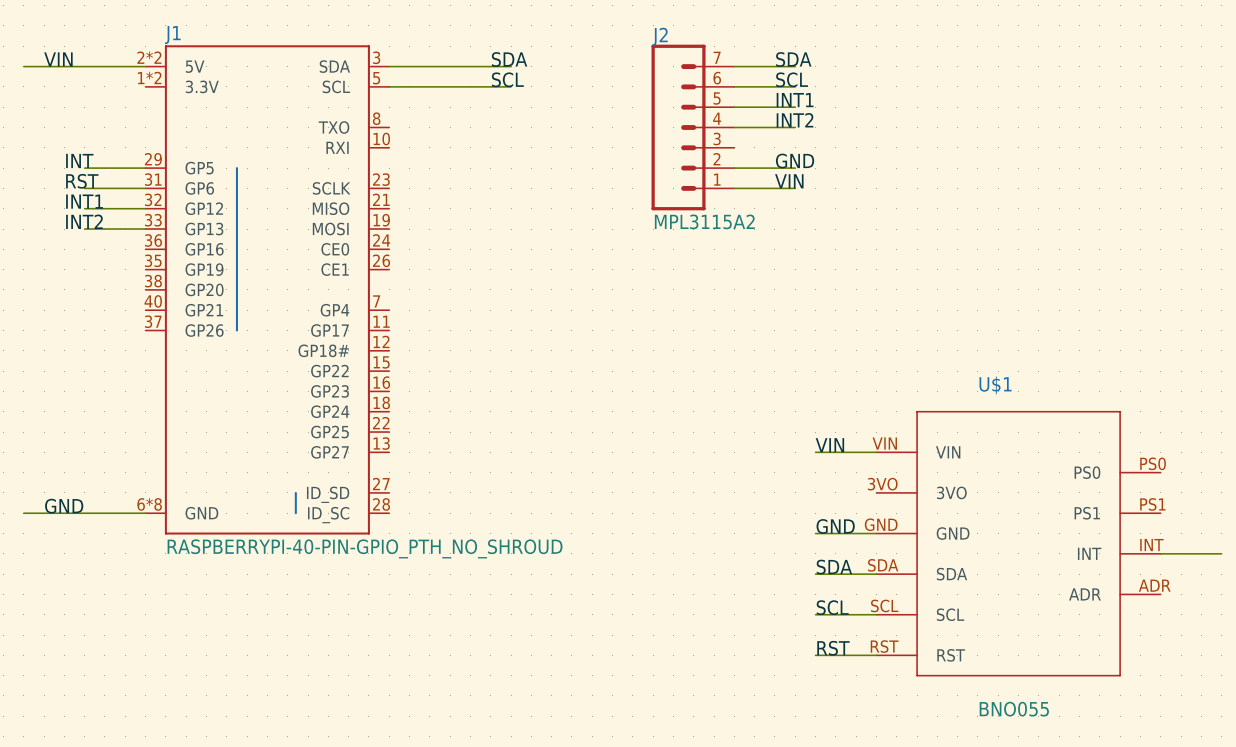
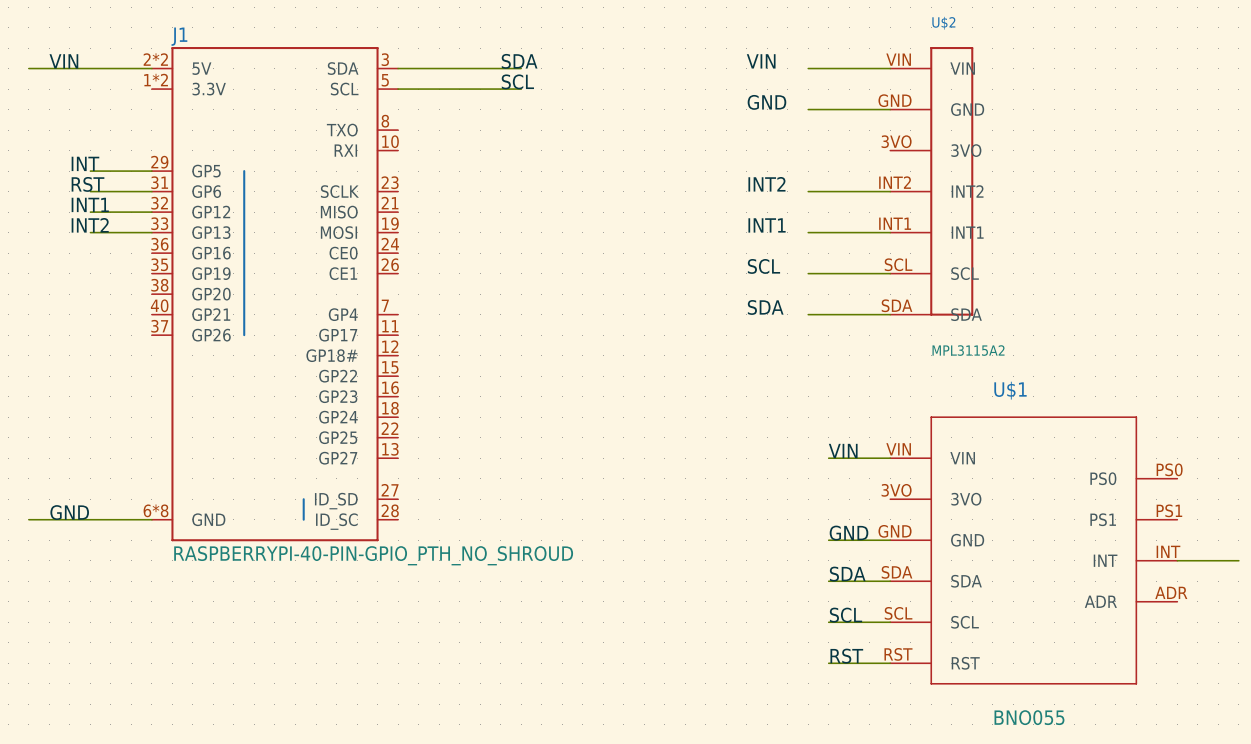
label: SDA (793, 59) -> none
wire: (734, 66) (795, 66) -> (890, 68) (808, 68)
label position: SCL (792, 79) -> SCL (763, 266)
wire: (734, 86) (795, 86) -> none
label position: INT1 (795, 100) -> INT1 (767, 225)
wire: (734, 107) (795, 107) -> (890, 109) (808, 109)
label position: INT2 (795, 120) -> INT2 (766, 184)
J2: (692, 127) -> none
wire: (734, 127) (795, 127) -> none
label position: GND (795, 161) -> GND (766, 102)
wire: (734, 168) (795, 168) -> none
U$2: none -> MPL3115A2 (931, 181)
label position: VIN (789, 181) -> VIN (761, 61)
wire: (734, 188) (795, 188) -> (890, 191) (808, 191)
wire: none -> (808, 232) (890, 232)
wire: none -> (808, 273) (890, 273)
label: none -> SDA (765, 307)
wire: none -> (808, 314) (890, 314)

